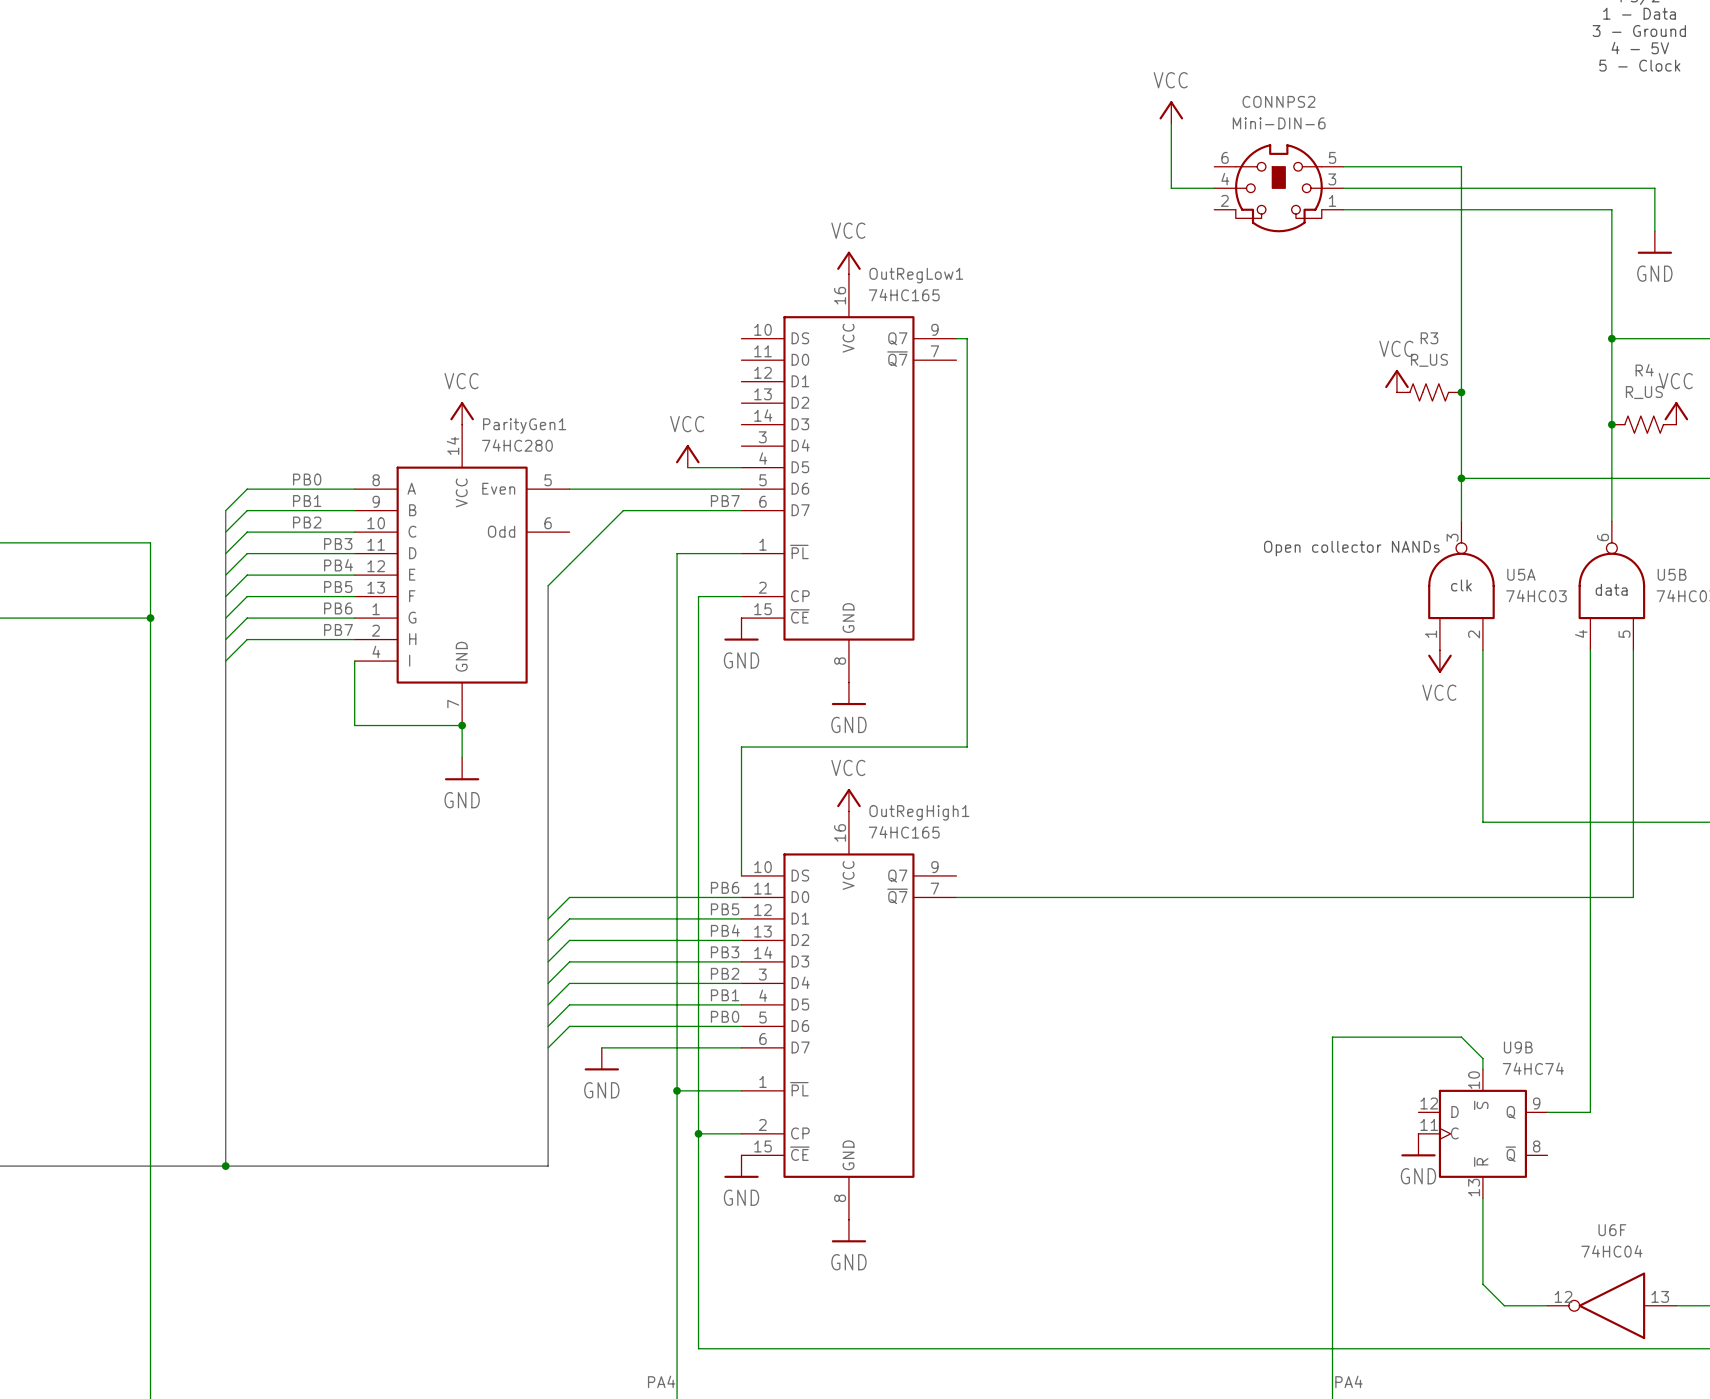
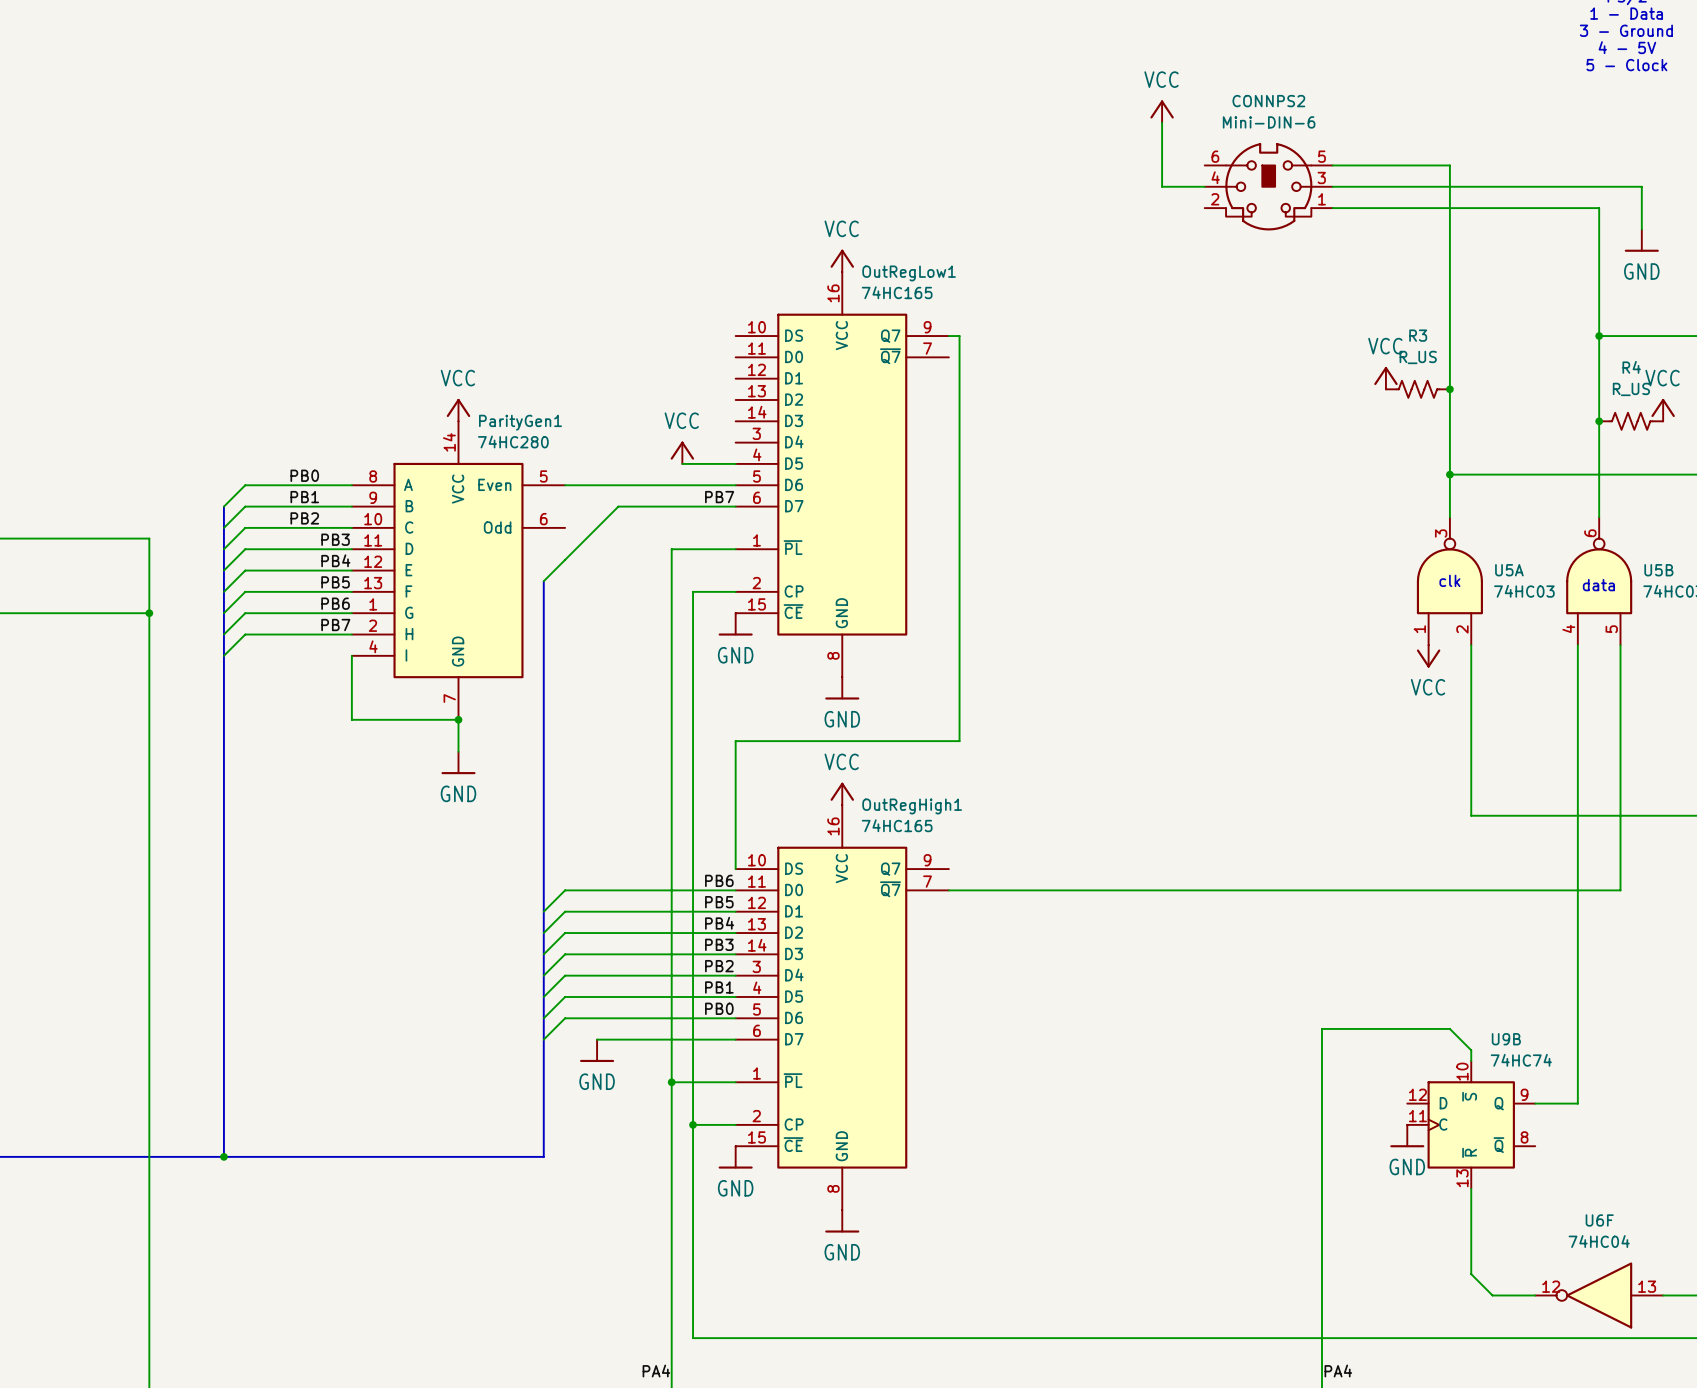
text: Open collector NANDs (1351, 548) -> none

